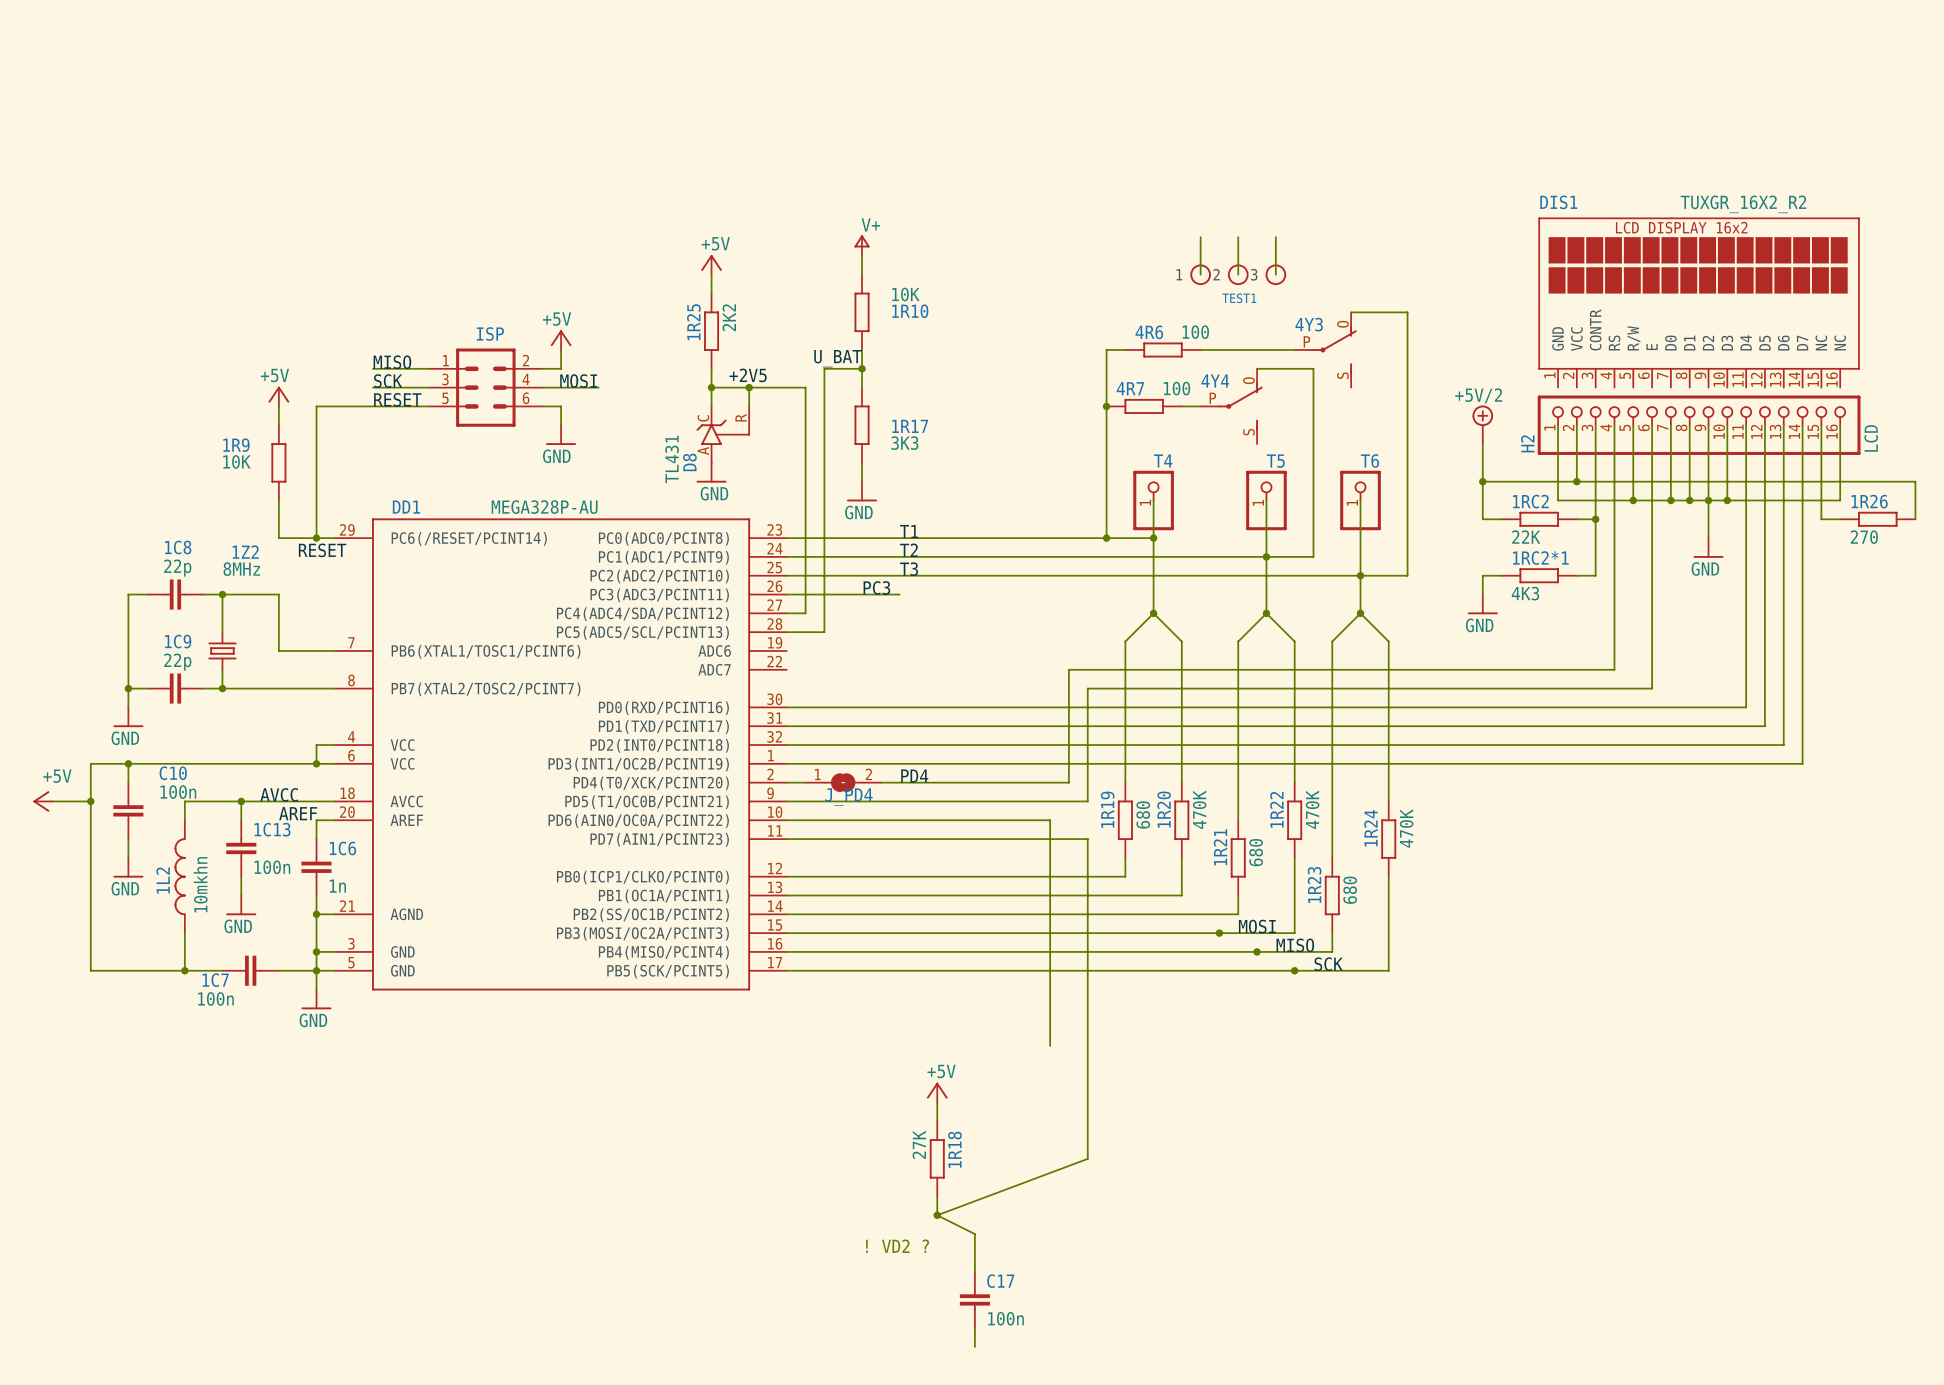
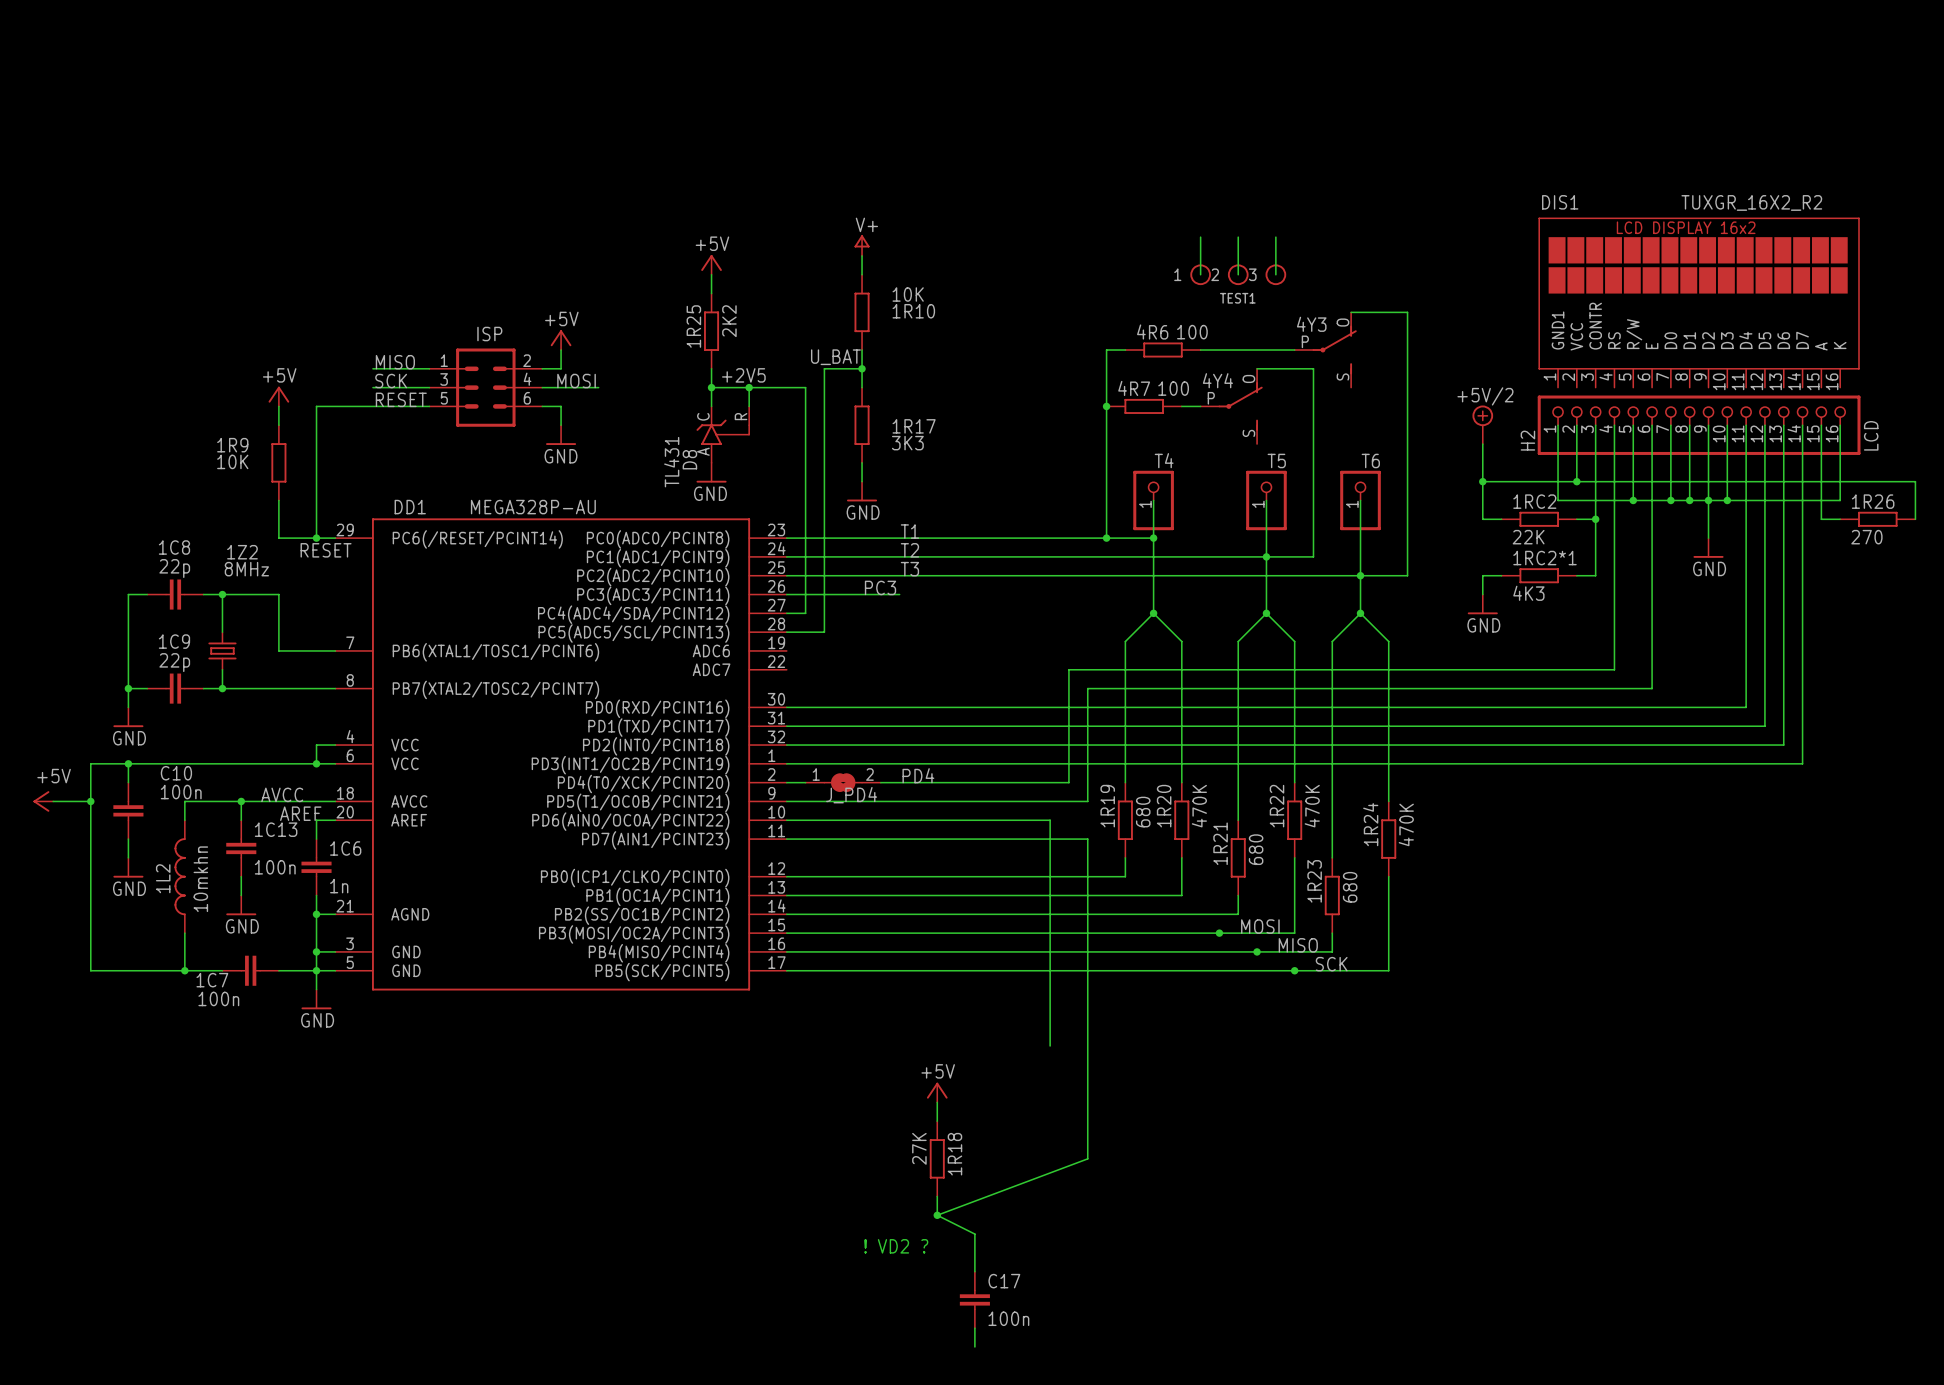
DIS1 pin name: GND (1558, 338) -> GND1 (1558, 330)
DIS1 pin name: NC (1821, 343) -> A (1821, 346)
DIS1 pin name: NC (1840, 343) -> K (1840, 345)

